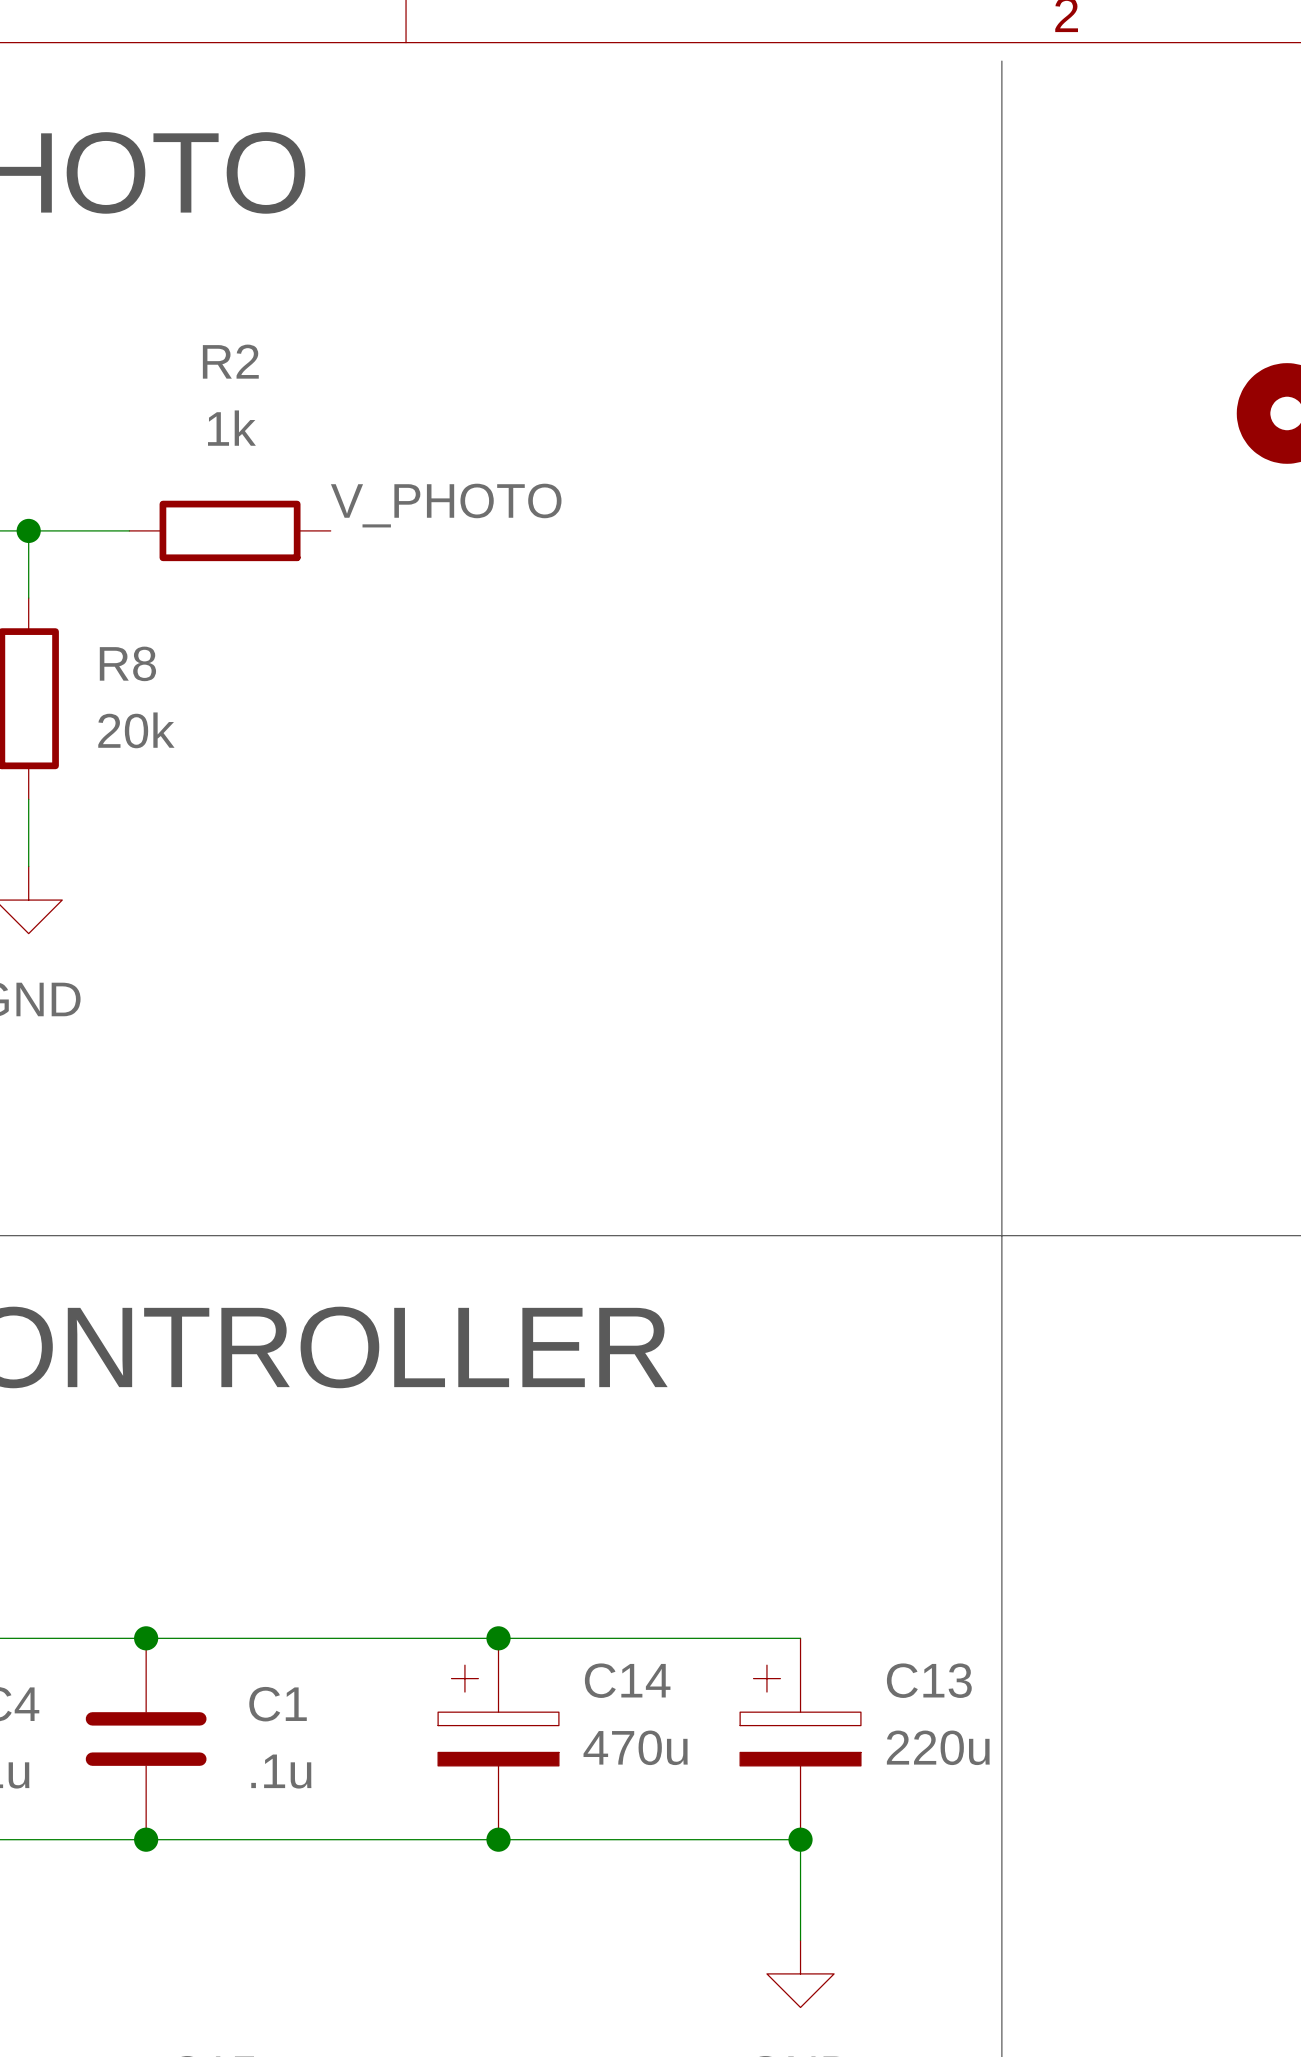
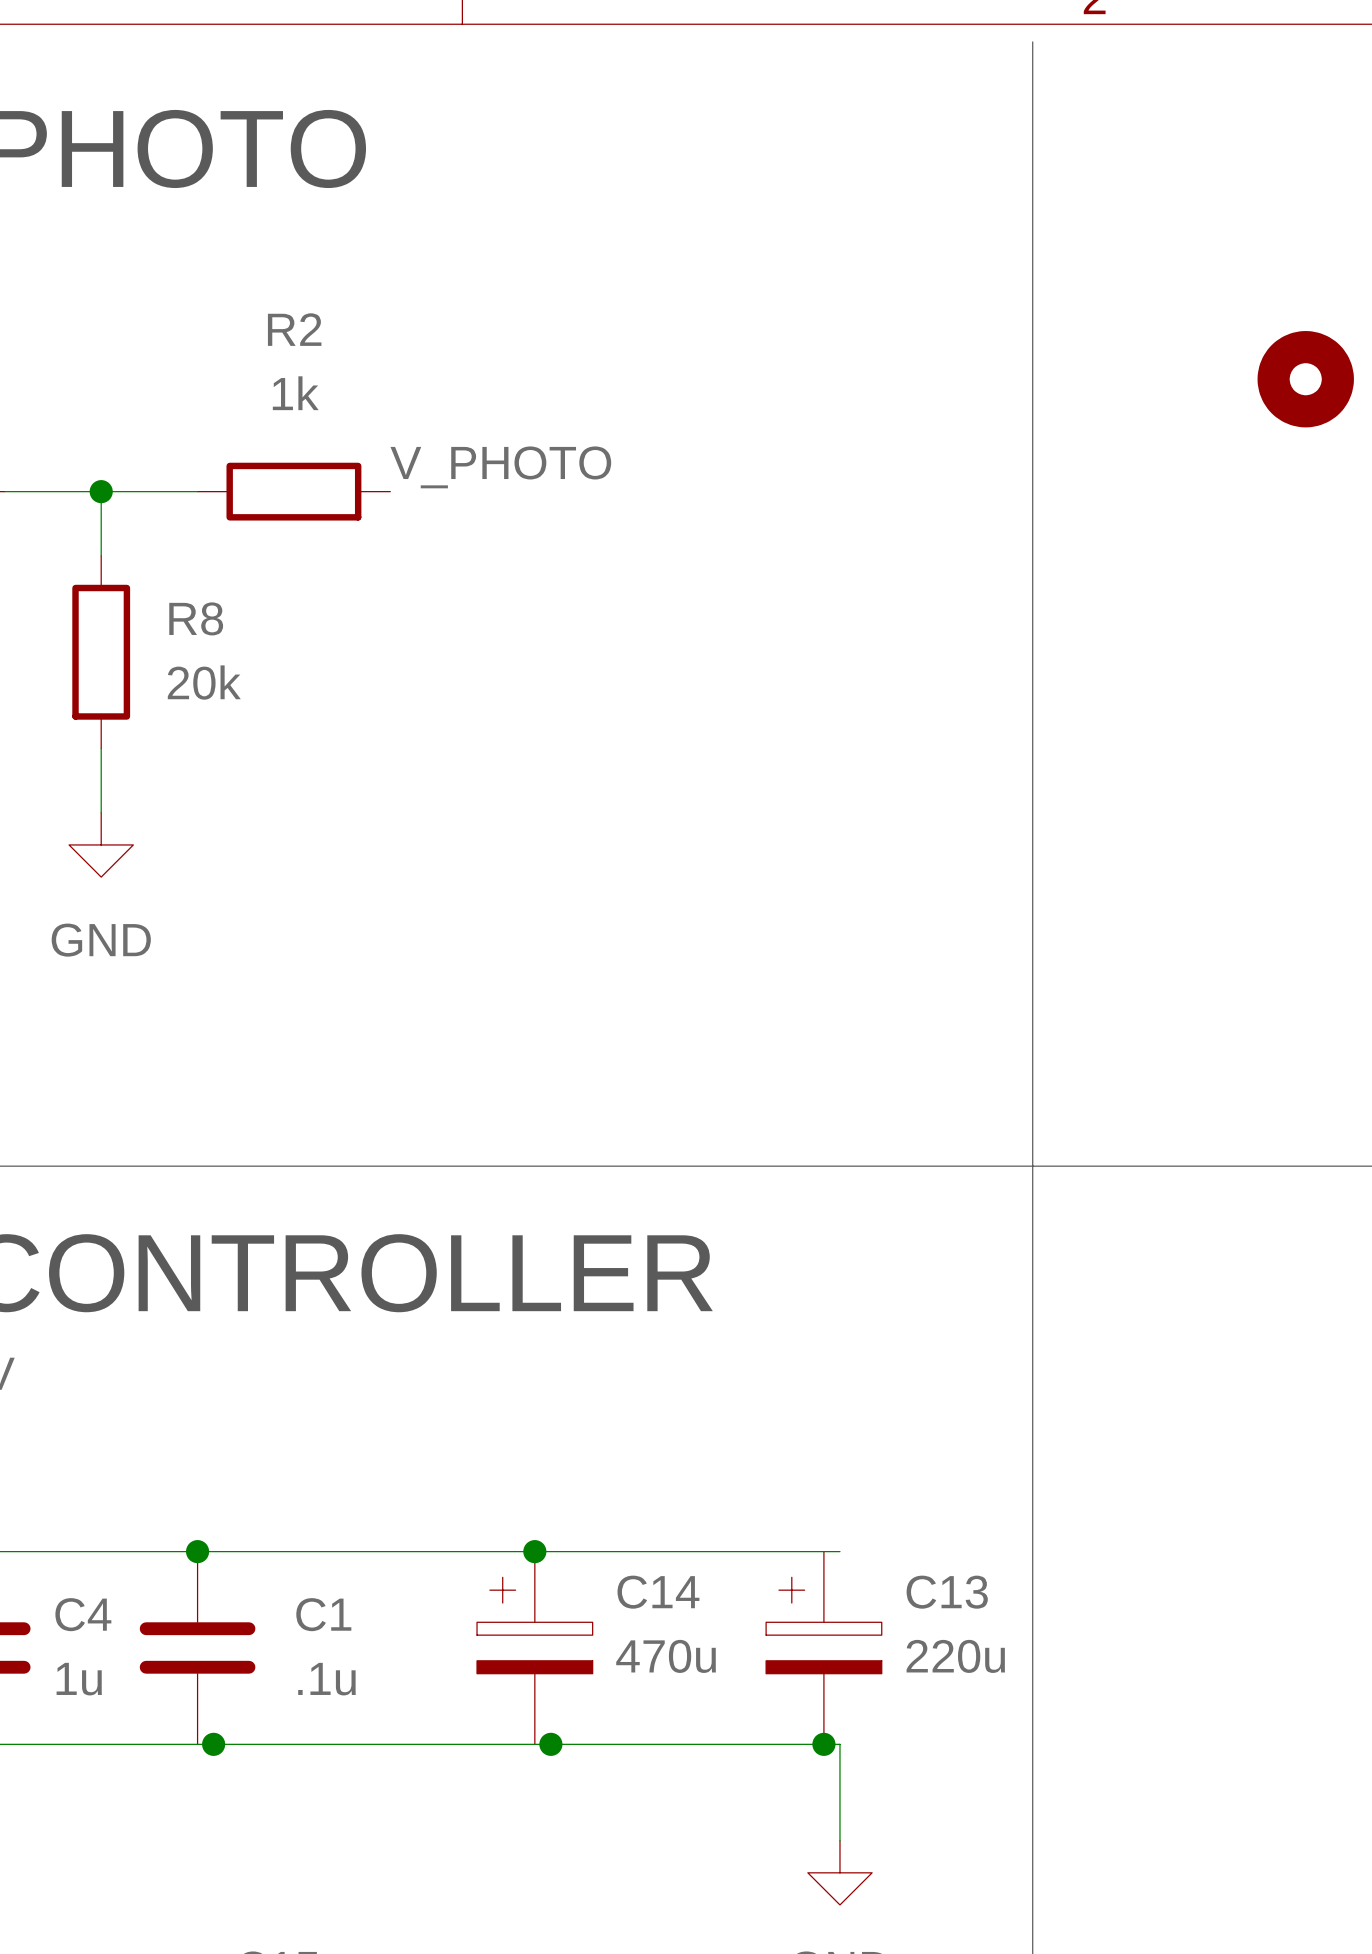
junction position: (146, 1638) -> (197, 1551)
junction position: (498, 1638) -> (534, 1551)
C1 position: (146, 1739) -> (197, 1647)
C14 position: (498, 1739) -> (534, 1647)
C13 position: (800, 1739) -> (823, 1647)
junction position: (800, 1839) -> (823, 1744)

